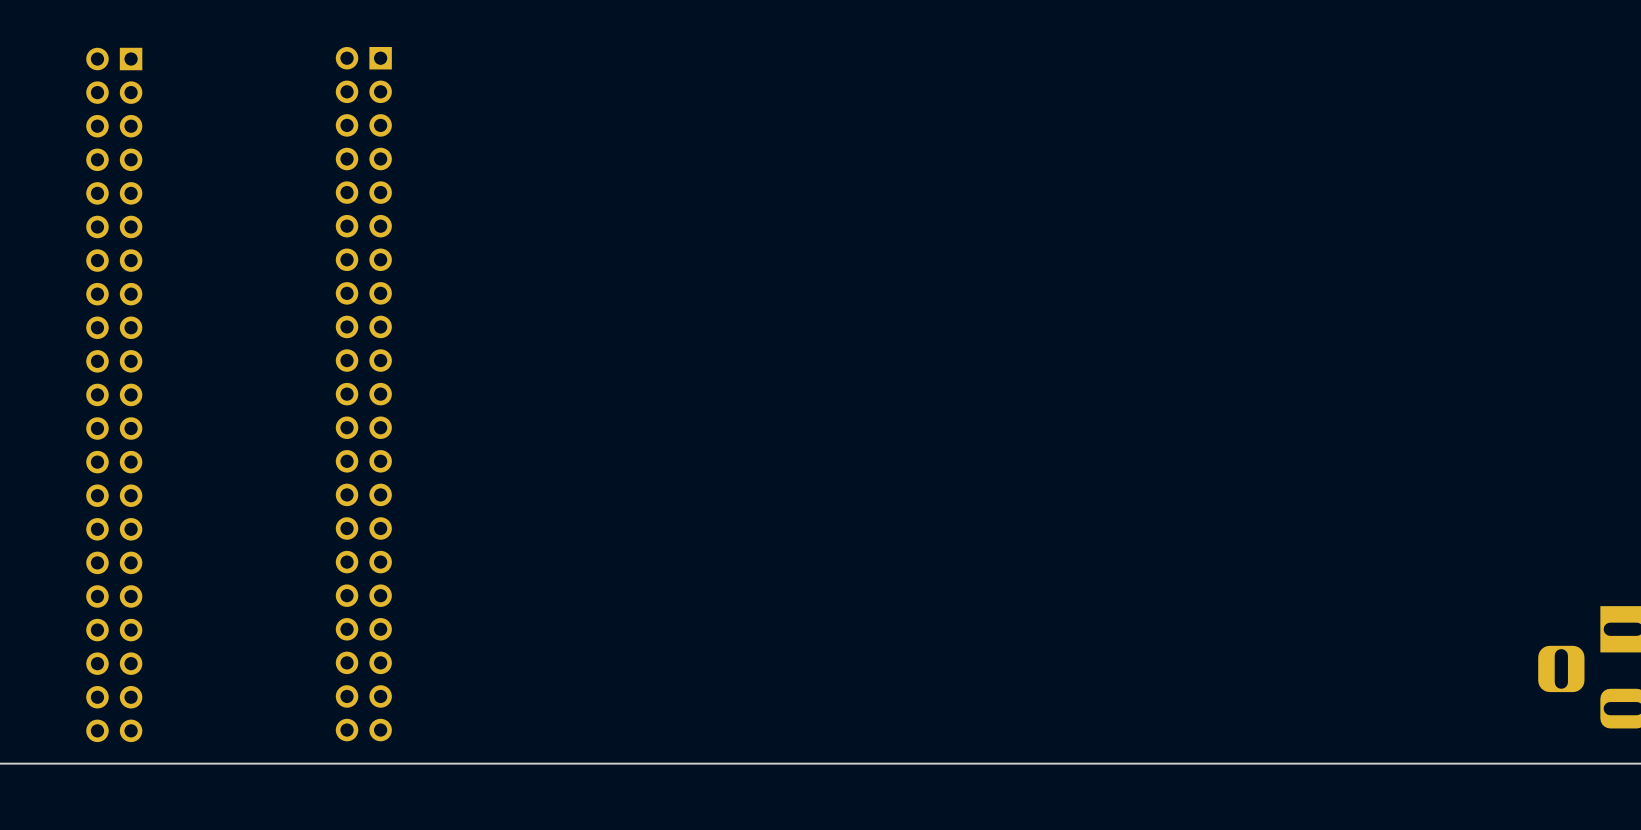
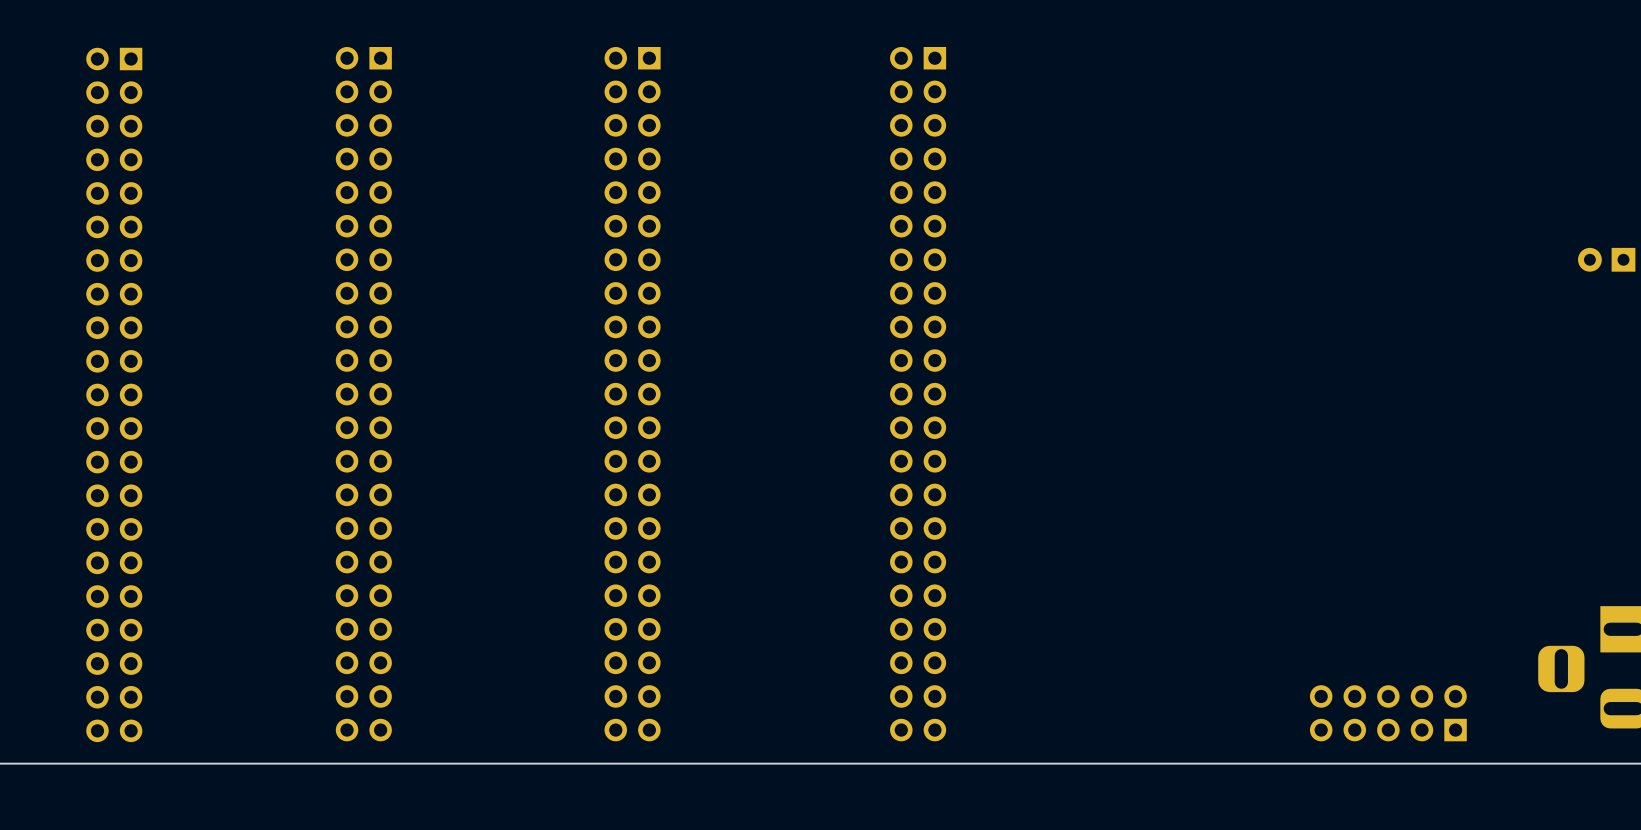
part: none -> (1606, 259)
part: none -> (632, 394)
part: none -> (918, 394)
part: none -> (1388, 713)

